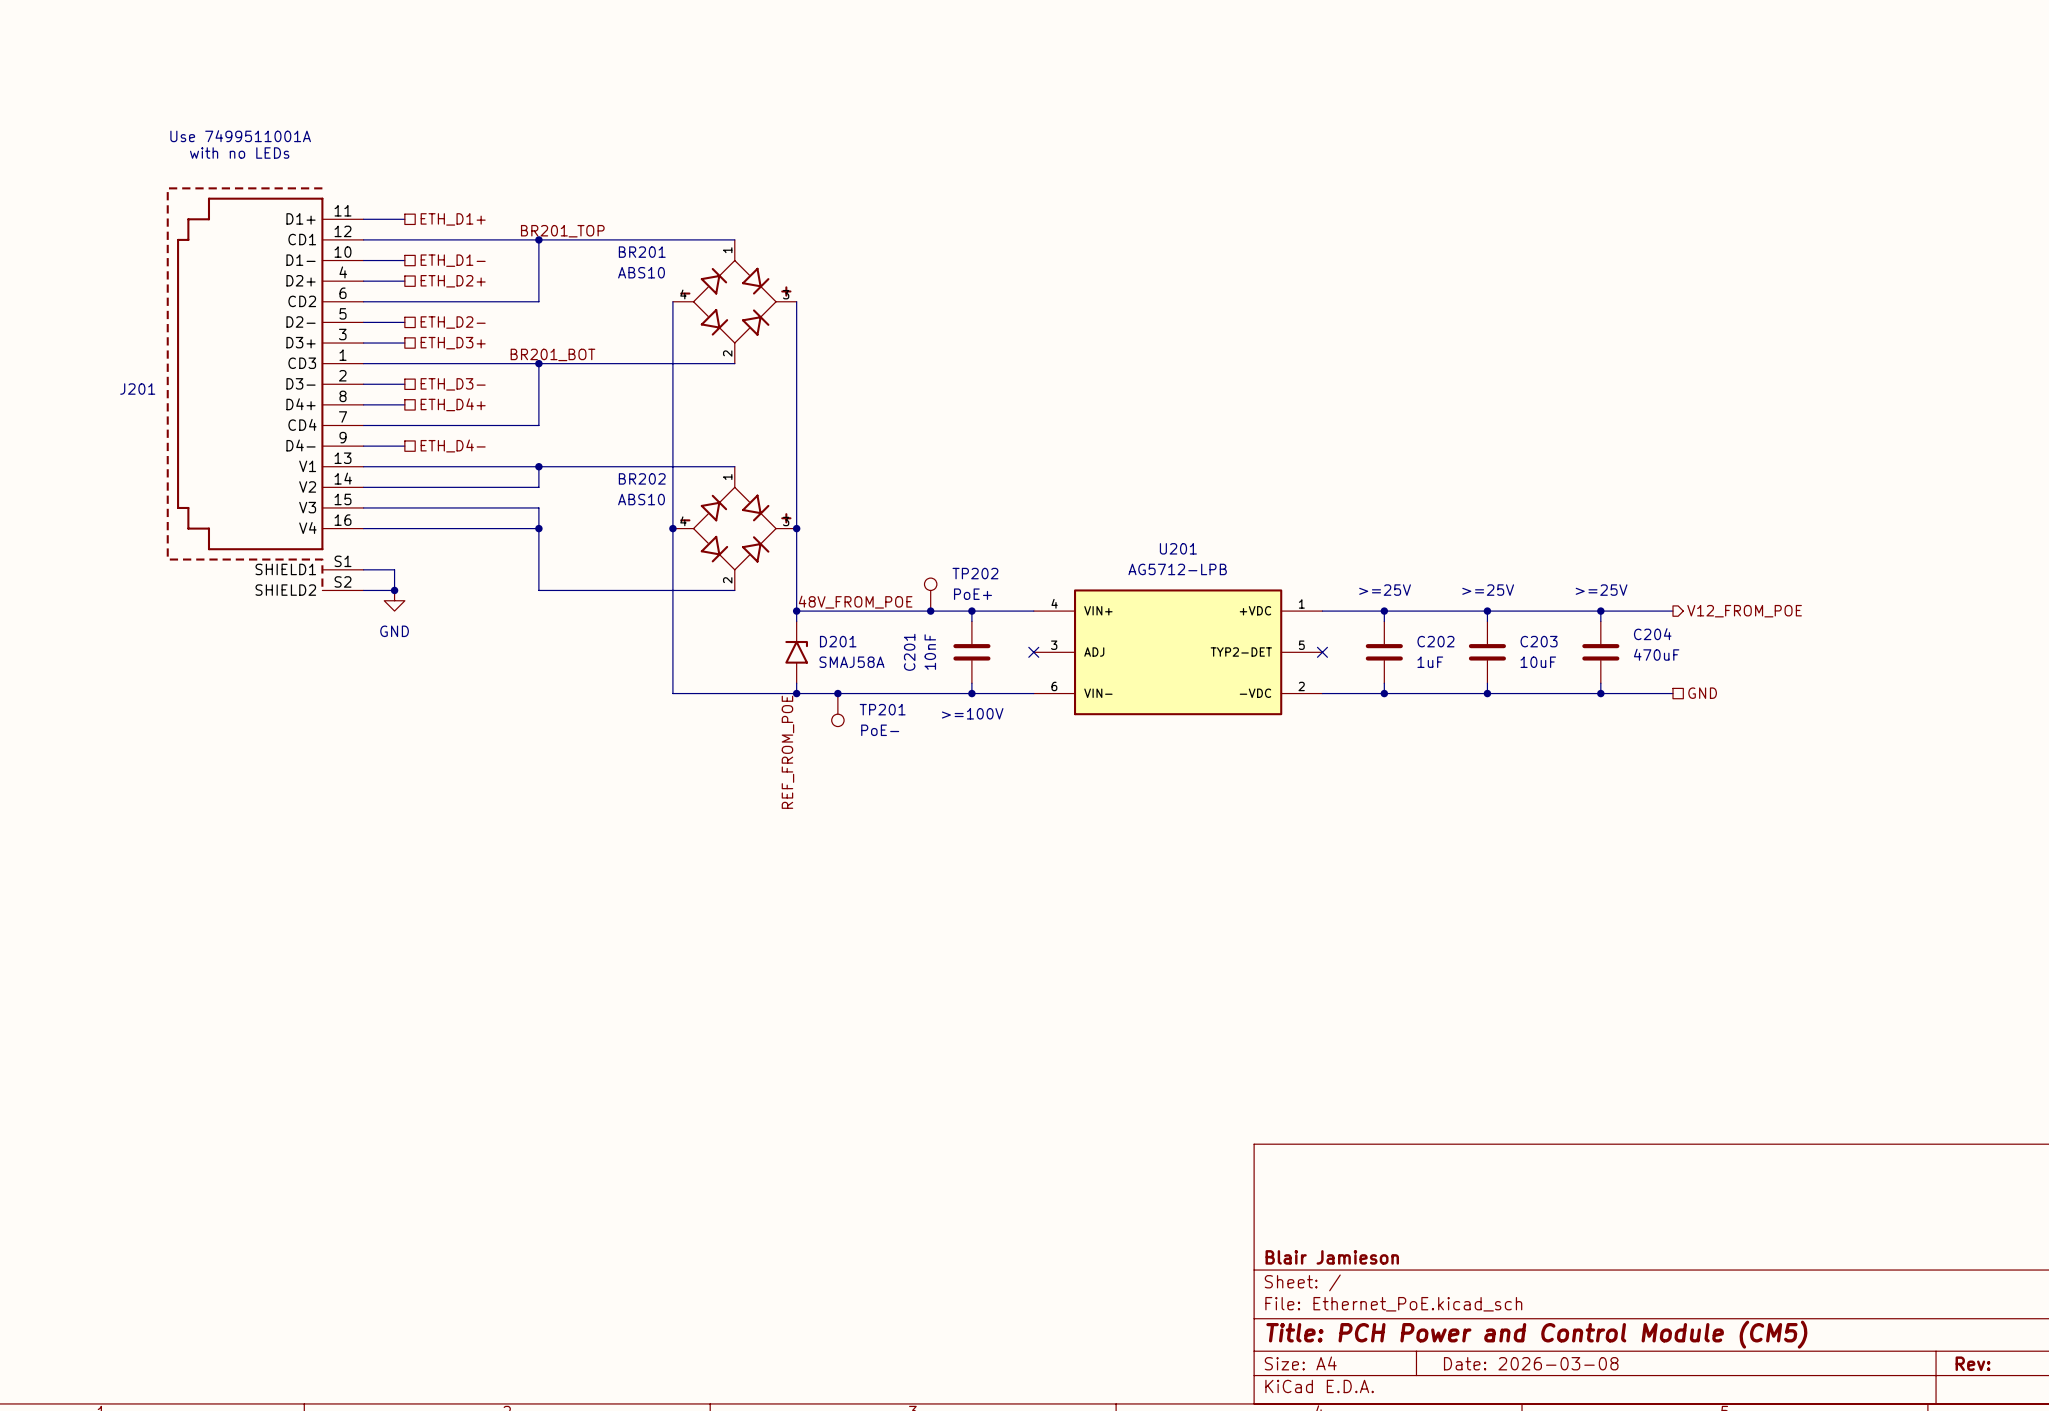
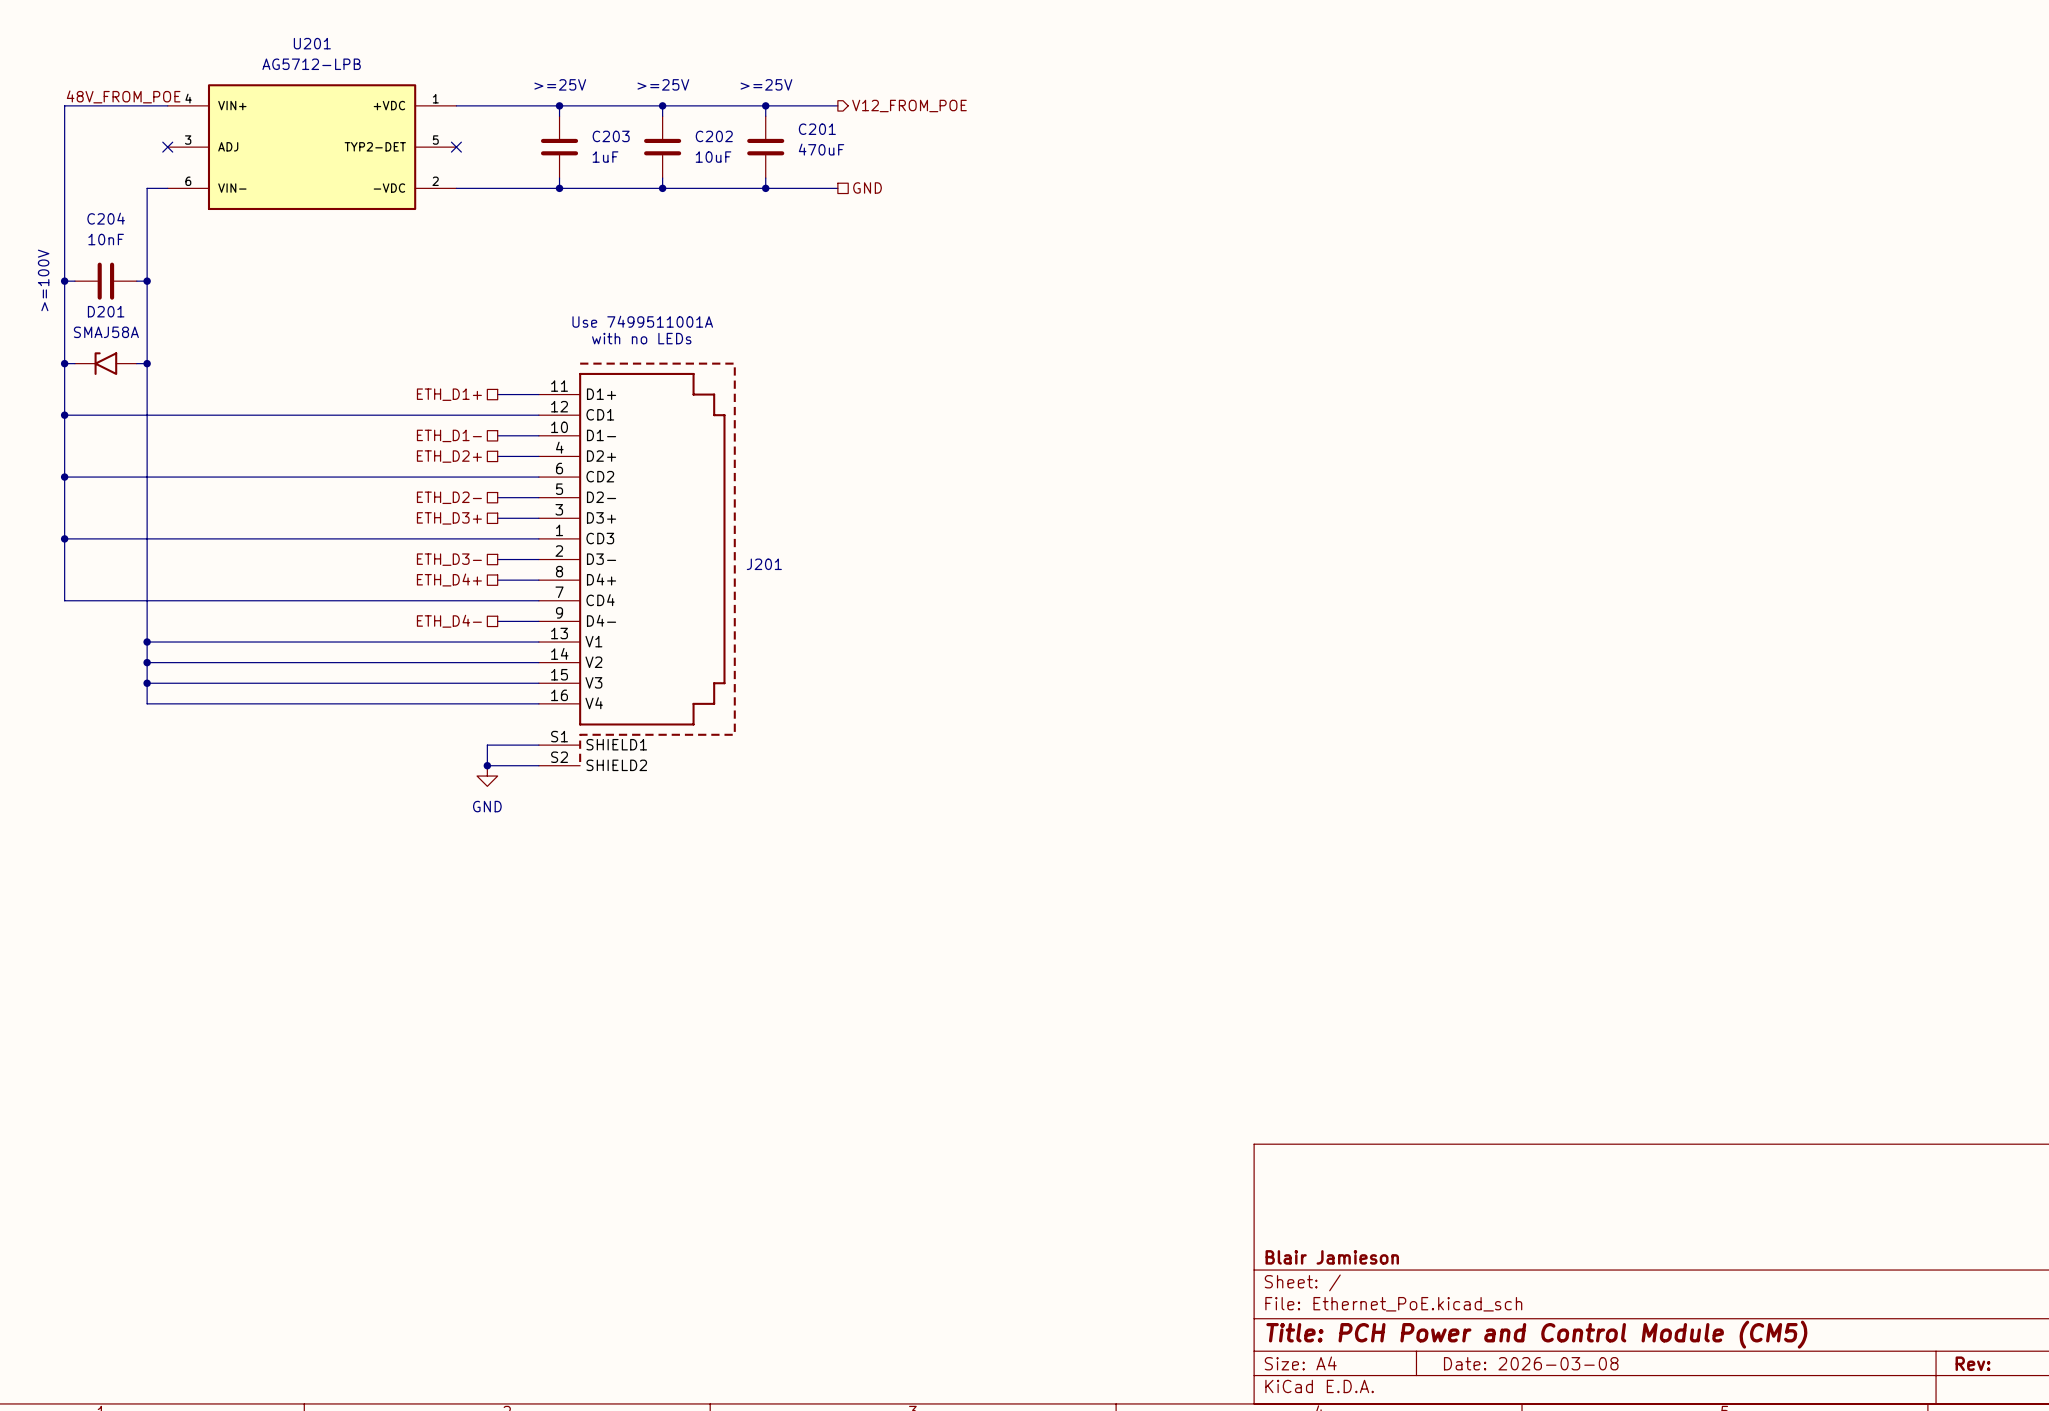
label: none -> 48V_FROM_POE (123, 96)
wire: none -> (167, 105) (64, 105) (64, 600) (538, 600)
wire: none -> (456, 105) (837, 105)
wire: none -> (559, 105) (559, 116)
junction: none -> (559, 105)
wire: none -> (662, 105) (662, 116)
junction: none -> (662, 105)
wire: none -> (765, 105) (765, 116)
junction: none -> (765, 105)
hierarchical label: none -> V12_FROM_POE (909, 105)
text: Use 7499511001A (240, 136) -> none
no-connect mark: none -> (167, 147)
no-connect mark: none -> (456, 147)
text: with no LEDs (239, 153) -> none
wire: none -> (559, 178) (559, 188)
wire: none -> (662, 178) (662, 188)
wire: none -> (765, 178) (765, 188)
hierarchical label: none -> GND (867, 187)
wire: none -> (167, 188) (147, 188) (147, 703) (538, 703)
wire: none -> (456, 188) (837, 188)
junction: none -> (559, 188)
junction: none -> (662, 188)
junction: none -> (765, 188)
wire: (363, 219) (404, 219) -> none
hierarchical label rotation: 0° (453, 219) -> 180° (449, 394)
hierarchical label position: ETH_D1+ (453, 219) -> ETH_D1+ (449, 394)
label: BR201_TOP (562, 231) -> none
wire: (363, 239) (734, 239) -> none
wire: (538, 239) (538, 301) (363, 301) -> none
junction: (538, 239) -> none
wire: (363, 260) (404, 260) -> none
hierarchical label rotation: 0° (453, 260) -> 180° (449, 435)
hierarchical label position: ETH_D1- (453, 260) -> ETH_D1- (449, 435)
wire: none -> (64, 281) (74, 281)
junction: none -> (64, 281)
wire: none -> (136, 281) (147, 281)
junction: none -> (147, 281)
wire: (363, 281) (404, 281) -> (497, 394) (538, 394)
hierarchical label rotation: 0° (453, 281) -> 180° (449, 456)
hierarchical label position: ETH_D2+ (453, 281) -> ETH_D2+ (449, 456)
wire: (672, 301) (672, 693) (1033, 693) -> none
BR201: ABS10 (734, 301) -> none
wire: (796, 301) (796, 621) -> none
text: none -> Use 7499511001A (642, 321)
wire: (363, 322) (404, 322) -> (497, 435) (538, 435)
hierarchical label rotation: 0° (453, 322) -> 180° (449, 497)
hierarchical label position: ETH_D2- (453, 322) -> ETH_D2- (449, 497)
text: none -> with no LEDs (641, 338)
wire: (363, 343) (404, 343) -> (497, 456) (538, 456)
hierarchical label rotation: 0° (453, 343) -> 180° (449, 518)
hierarchical label position: ETH_D3+ (453, 343) -> ETH_D3+ (449, 518)
label: BR201_BOT (552, 354) -> none
wire: none -> (64, 363) (74, 363)
junction: none -> (64, 363)
wire: none -> (136, 363) (147, 363)
junction: none -> (147, 363)
wire: (363, 363) (734, 363) -> none
wire: (538, 363) (538, 425) (363, 425) -> none
junction: (538, 363) -> none
wire: (363, 384) (404, 384) -> (497, 497) (538, 497)
hierarchical label rotation: 0° (453, 384) -> 180° (449, 559)
hierarchical label position: ETH_D3- (453, 384) -> ETH_D3- (449, 559)
J201 flip: as is (245, 389) -> left-right (657, 564)
J201 position: (265, 389) -> (637, 564)
wire: (363, 404) (404, 404) -> (497, 518) (538, 518)
hierarchical label rotation: 0° (453, 404) -> 180° (449, 580)
hierarchical label position: ETH_D4+ (453, 404) -> ETH_D4+ (449, 580)
wire: none -> (64, 415) (538, 415)
junction: none -> (64, 415)
hierarchical label rotation: 0° (453, 445) -> 180° (449, 621)
hierarchical label position: ETH_D4- (453, 445) -> ETH_D4- (449, 621)
wire: (363, 446) (404, 446) -> (497, 559) (538, 559)
wire: (363, 466) (734, 466) -> none
wire: (538, 466) (538, 487) (363, 487) -> none
junction: (538, 466) -> none
wire: none -> (64, 477) (538, 477)
junction: none -> (64, 477)
wire: (363, 507) (538, 507) (538, 590) (734, 590) -> none
wire: (363, 528) (538, 528) -> none
junction: (538, 528) -> none
junction: (672, 528) -> none
BR202: ABS10 (734, 528) -> none
junction: (796, 528) -> none
wire: none -> (64, 538) (538, 538)
junction: none -> (64, 538)
wire: (363, 569) (394, 569) (394, 590) (363, 590) -> none
wire: none -> (497, 580) (538, 580)
junction: (394, 590) -> none
C204 text: >=25V (1601, 590) -> >=100V (43, 280)
TP202: PoE+ (930, 594) -> none
power symbol position: GND (394, 600) -> GND (487, 776)
label: 48V_FROM_POE (855, 602) -> none
wire: (796, 611) (1033, 611) -> none
junction: (796, 611) -> none
junction: (930, 611) -> none
wire: (971, 611) (971, 621) -> none
junction: (971, 611) -> none
wire: (1322, 611) (1673, 611) -> none
wire: (1384, 611) (1384, 621) -> none
junction: (1384, 611) -> none
wire: (1487, 611) (1487, 621) -> none
junction: (1487, 611) -> none
wire: (1600, 611) (1600, 621) -> none
junction: (1600, 611) -> none
hierarchical label: V12_FROM_POE (1744, 611) -> none
wire: none -> (497, 621) (538, 621)
C204 name position: C204 (1652, 634) -> C204 (106, 218)
wire: none -> (147, 642) (538, 642)
junction: none -> (147, 642)
D201 rotation: 0° (796, 652) -> 90° counterclockwise (105, 363)
D201 position: (796, 652) -> (105, 363)
C201 name rotation: 0° (909, 652) -> 90° clockwise (817, 129)
C201 name position: C201 (909, 652) -> C201 (817, 129)
C201 value: 10nF (930, 652) -> 470uF (821, 149)
C201 position: (971, 652) -> (765, 147)
no-connect mark: (1033, 652) -> none
U201 position: (1178, 652) -> (312, 147)
no-connect mark: (1322, 652) -> none
C202 position: (1384, 652) -> (662, 147)
C203 position: (1487, 652) -> (559, 147)
C204 rotation: 0° (1600, 652) -> 90° clockwise (105, 281)
C204 position: (1600, 652) -> (105, 281)
C204 value: 470uF (1656, 654) -> 10nF (106, 239)
wire: none -> (147, 662) (538, 662)
junction: none -> (147, 662)
D201 value position: SMAJ58A (851, 662) -> SMAJ58A (106, 332)
C202 value: 1uF (1430, 662) -> 10uF (713, 157)
C203 value: 10uF (1538, 662) -> 1uF (605, 157)
wire: none -> (147, 683) (538, 683)
junction: none -> (147, 683)
wire: (796, 683) (796, 693) -> none
wire: (971, 683) (971, 693) -> none
wire: (1384, 683) (1384, 693) -> none
wire: (1487, 683) (1487, 693) -> none
wire: (1600, 683) (1600, 693) -> none
junction: (796, 693) -> none
junction: (837, 693) -> none
junction: (971, 693) -> none
wire: (1322, 693) (1673, 693) -> none
junction: (1384, 693) -> none
junction: (1487, 693) -> none
junction: (1600, 693) -> none
hierarchical label: GND (1702, 693) -> none
TP201: PoE- (837, 710) -> none
C201 text: >=100V (972, 713) -> >=25V (766, 84)
wire: none -> (538, 745) (487, 745) (487, 765) (538, 765)
label: REF_FROM_POE (787, 752) -> none
junction: none -> (487, 765)

